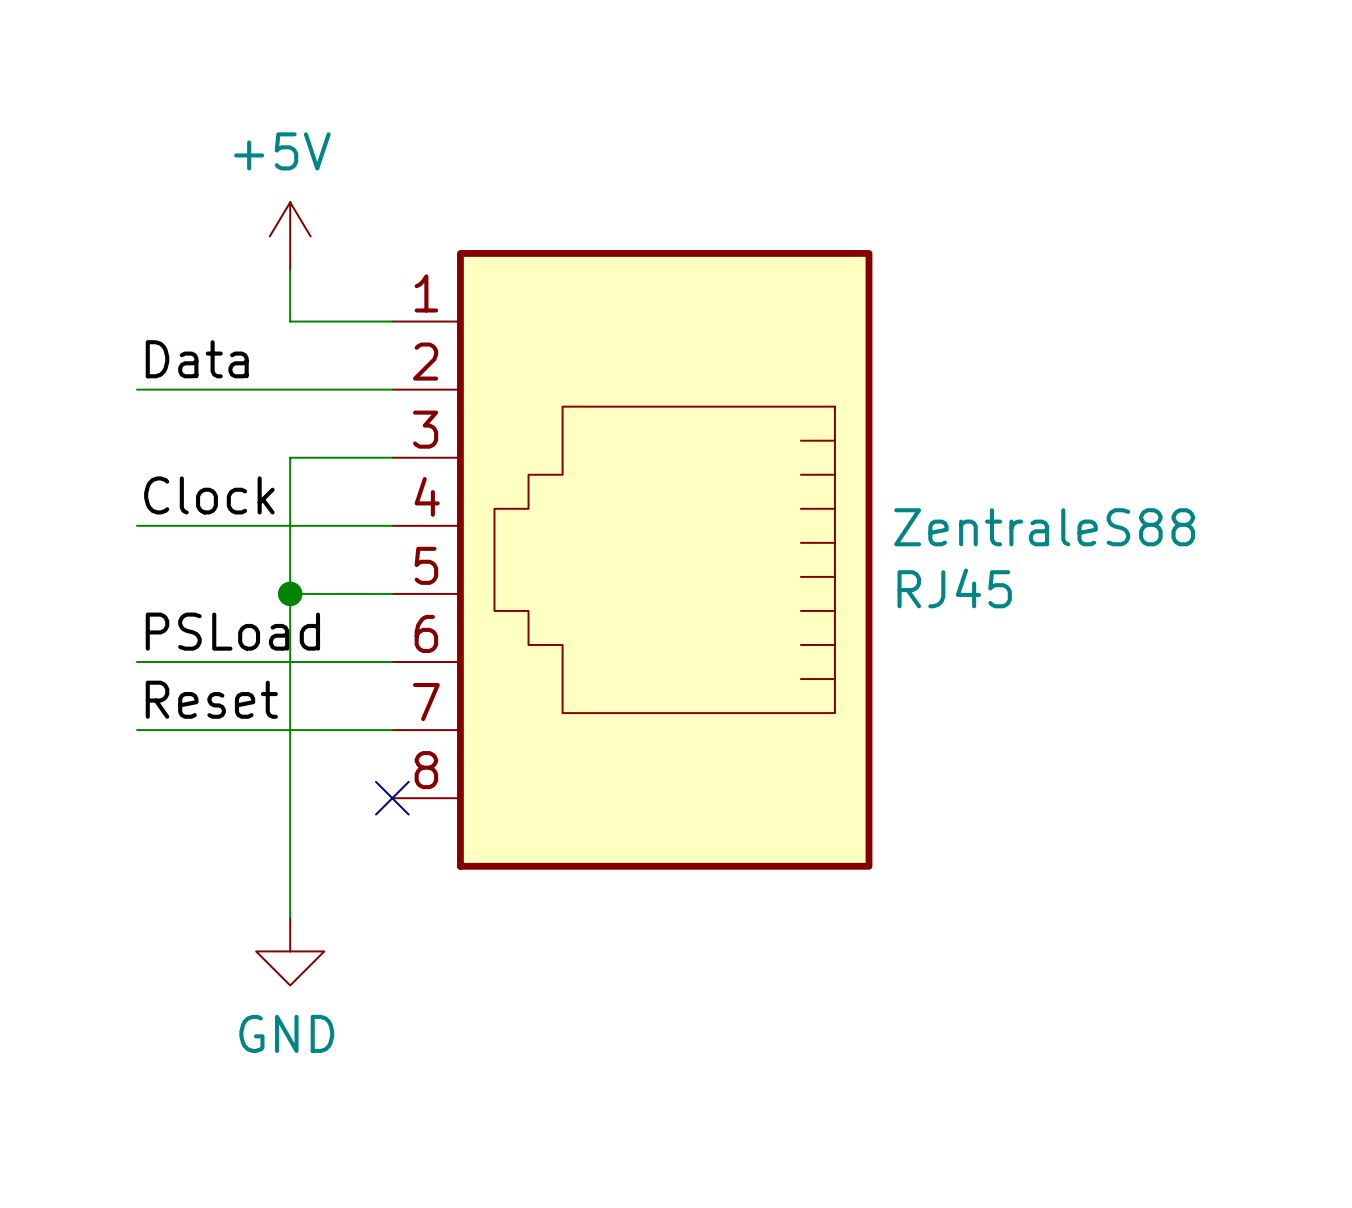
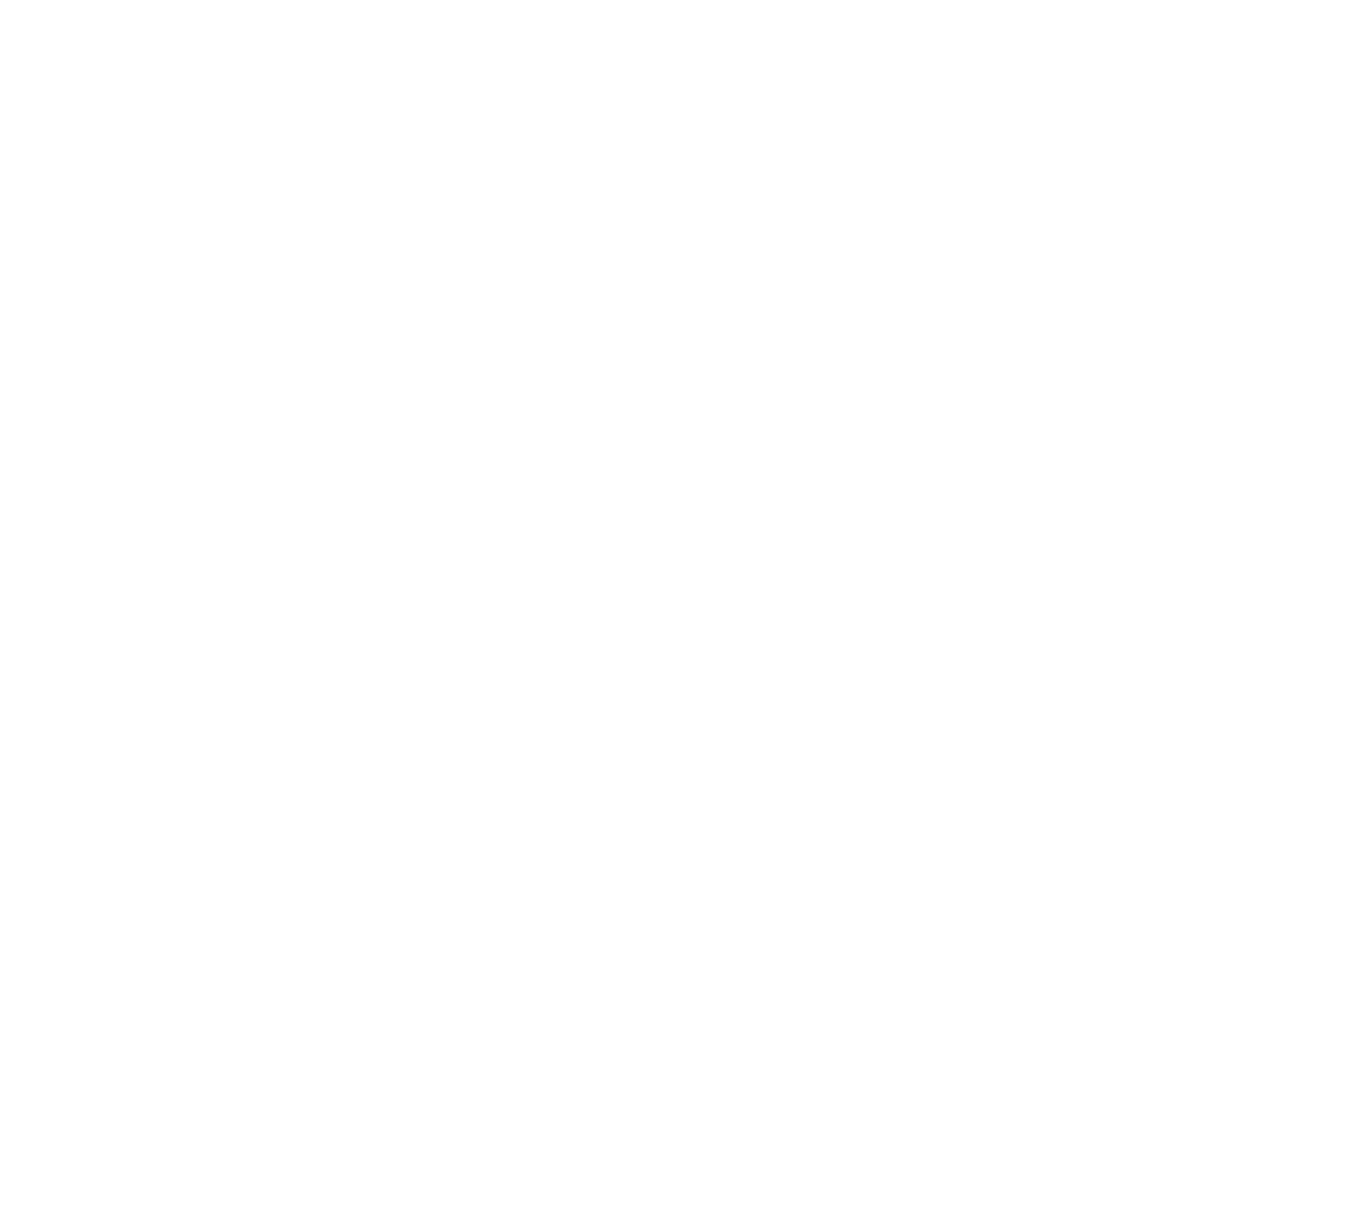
power symbol: +5V (290, 236) -> none
wire: (290, 270) (290, 321) (392, 321) -> none
label: Data (197, 359) -> none
wire: (136, 389) (392, 389) -> none
wire: (392, 457) (290, 457) (290, 917) -> none
label: Clock (209, 495) -> none
wire: (136, 525) (392, 525) -> none
ZentraleS88: RJ45 (632, 559) -> none
wire: (290, 593) (392, 593) -> none
junction: (290, 593) -> none
label: PSLoad (232, 631) -> none
wire: (136, 662) (392, 662) -> none
label: Reset (211, 699) -> none
wire: (136, 730) (392, 730) -> none
no-connect mark: (392, 798) -> none
power symbol: GND (290, 951) -> none

